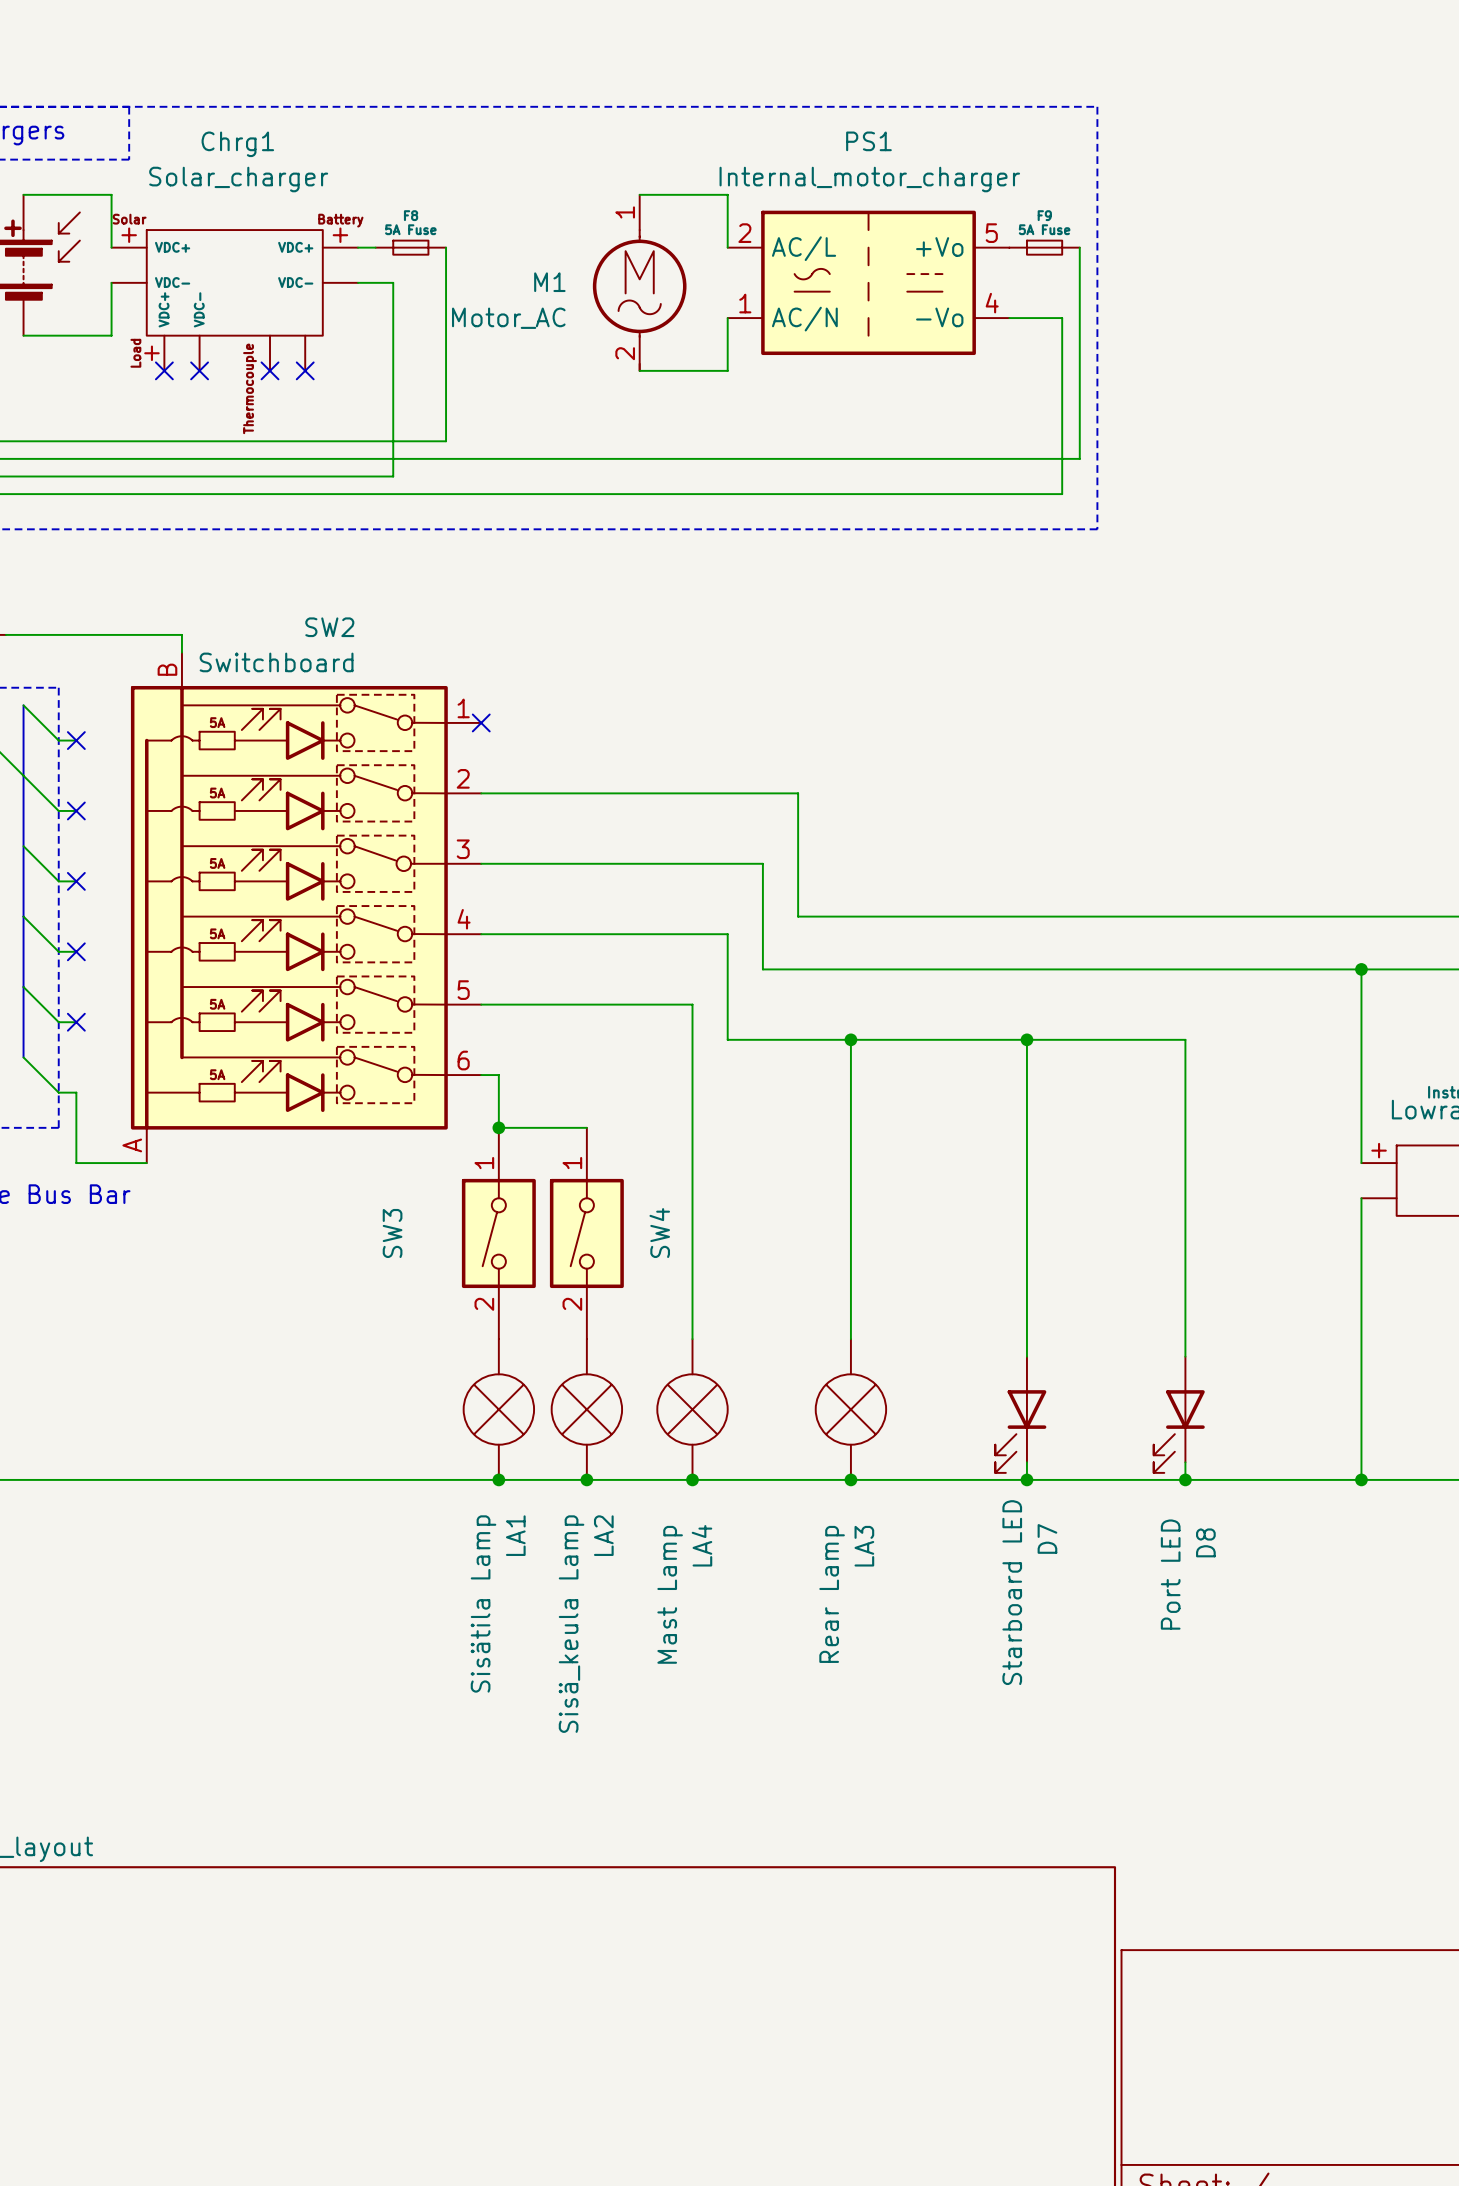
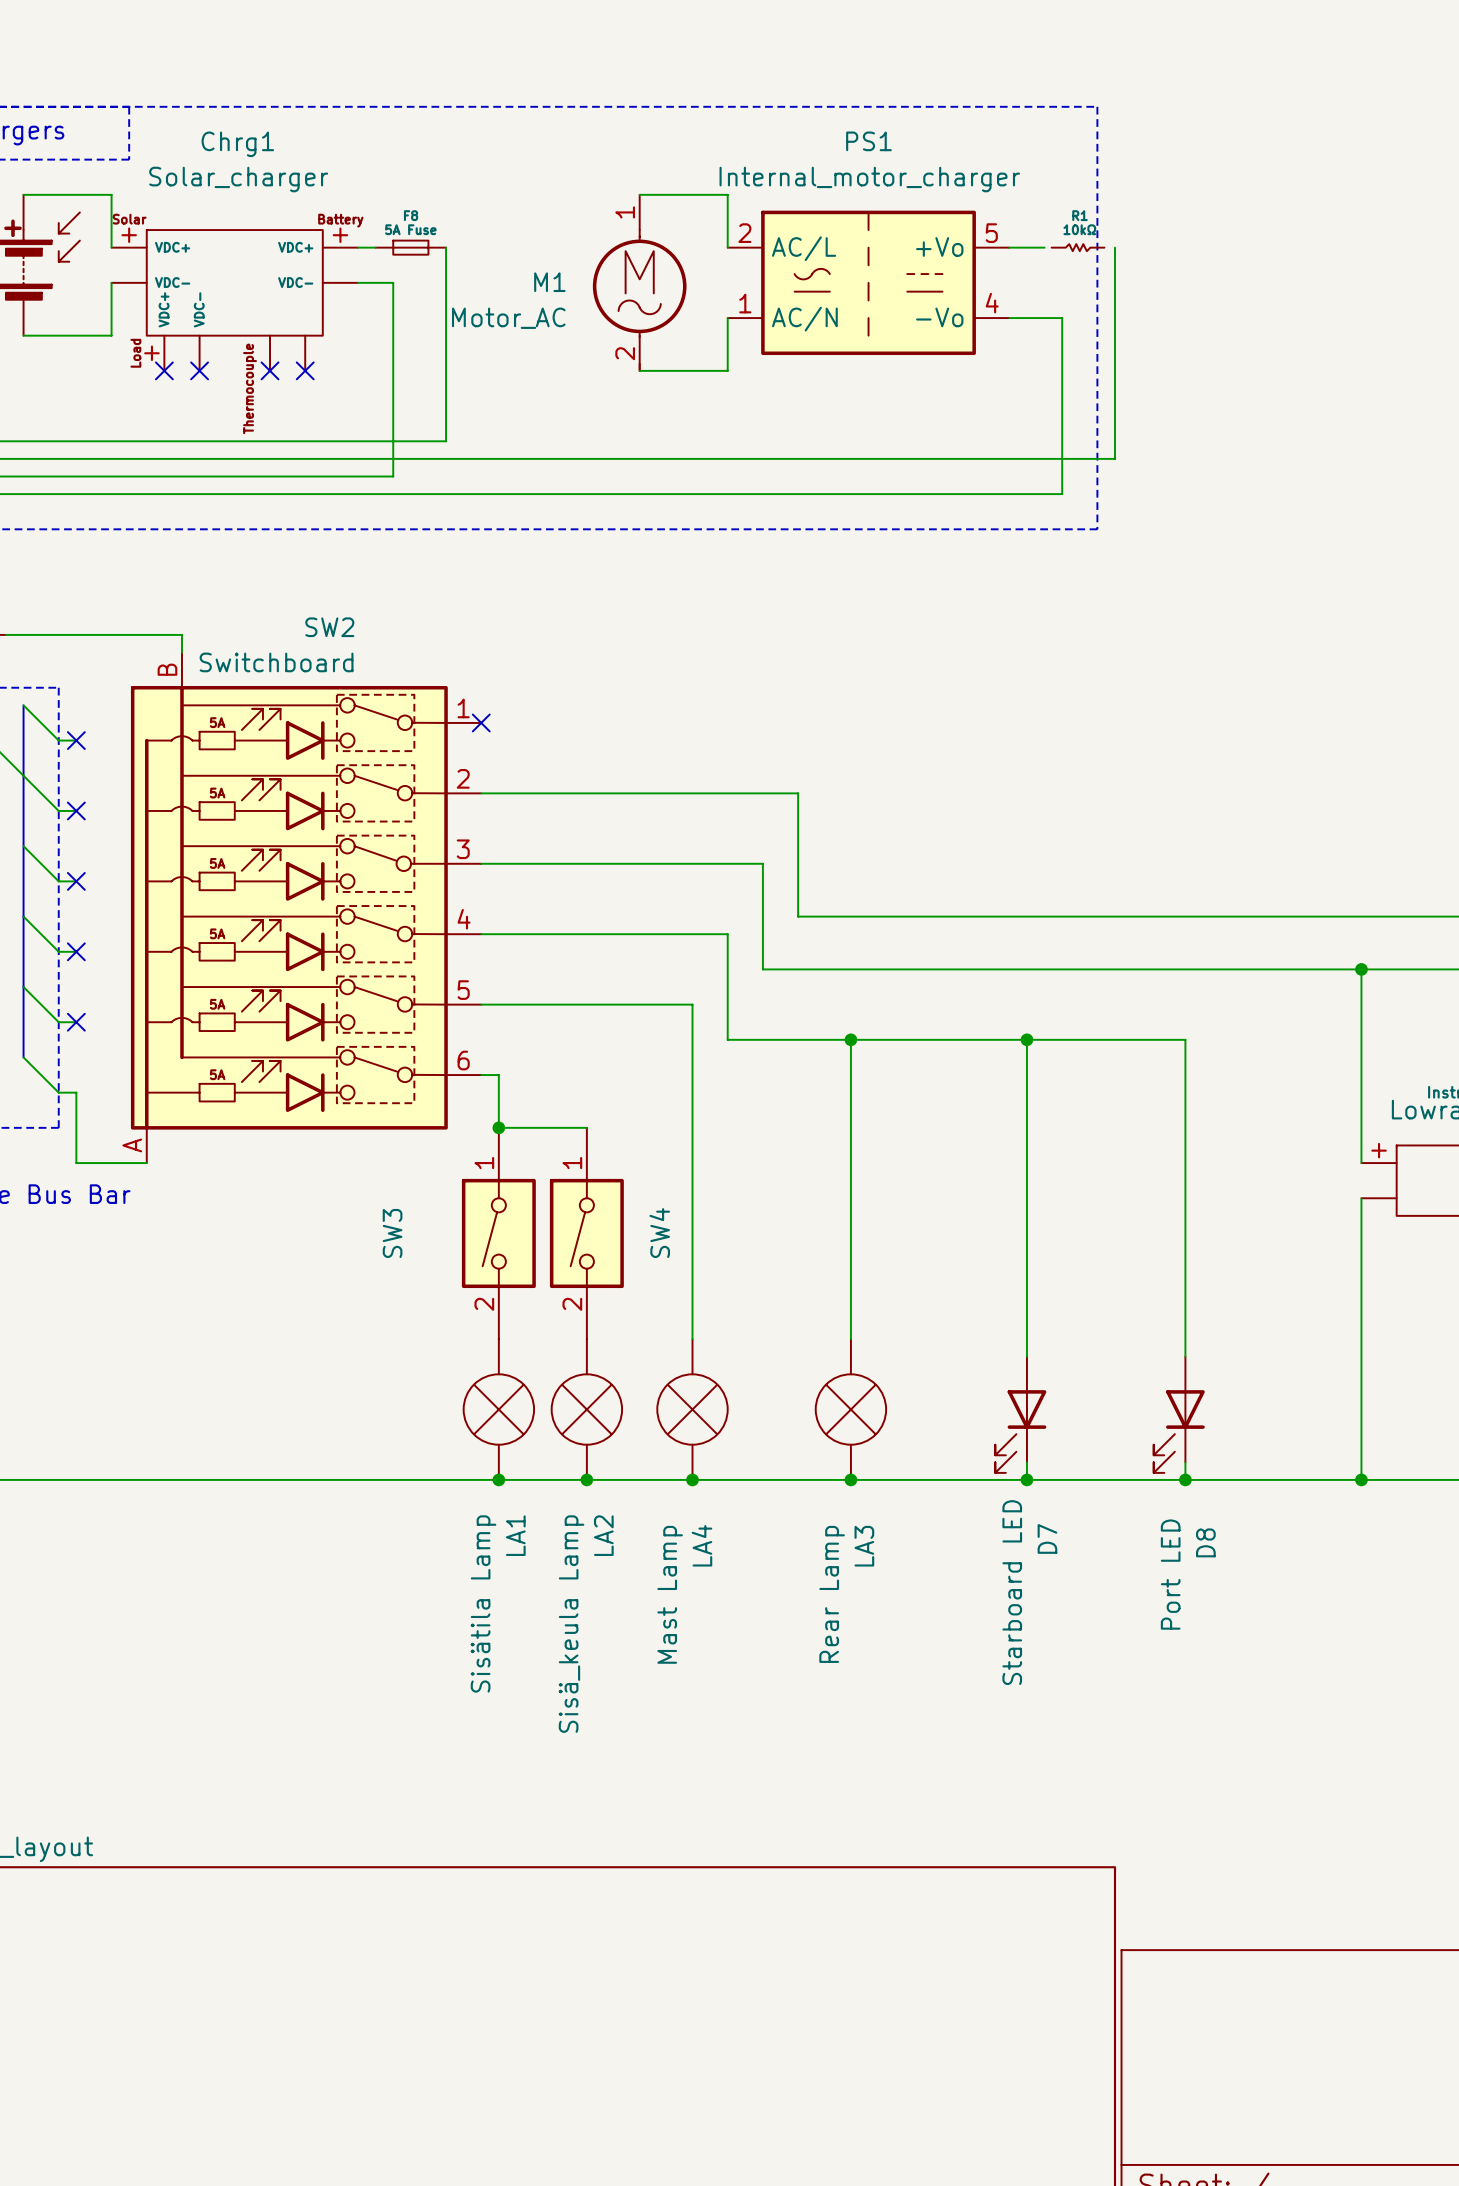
F9: 5A Fuse (1044, 247) -> none
R1: none -> 10kΩ (1078, 247)
wire: (1079, 247) (1079, 458) -> (1115, 247) (1115, 458) (1079, 458)

